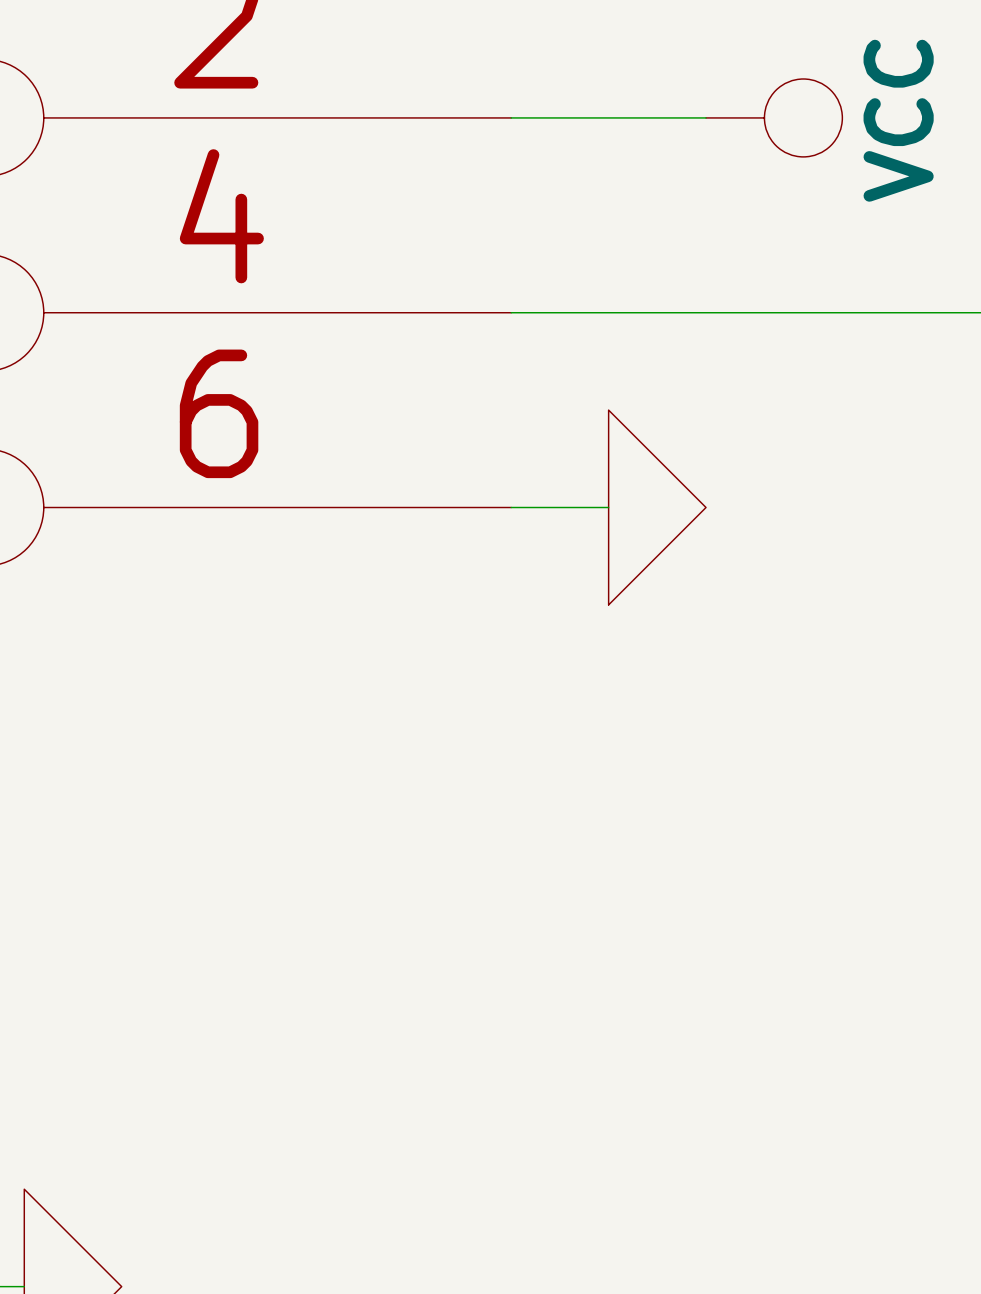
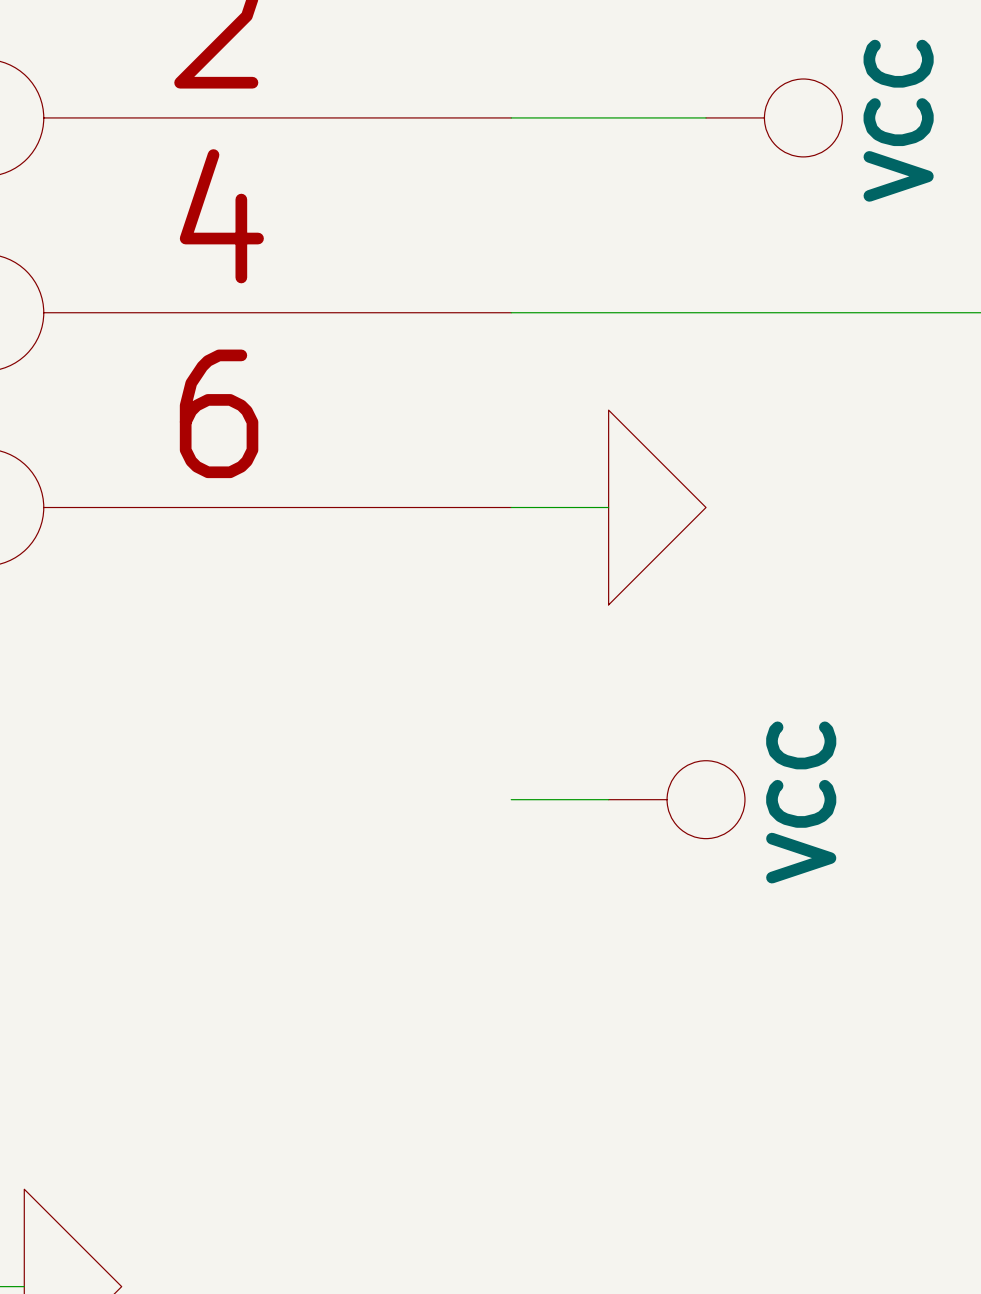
wire: none -> (511, 799) (608, 799)
power symbol: none -> VCC (676, 799)

